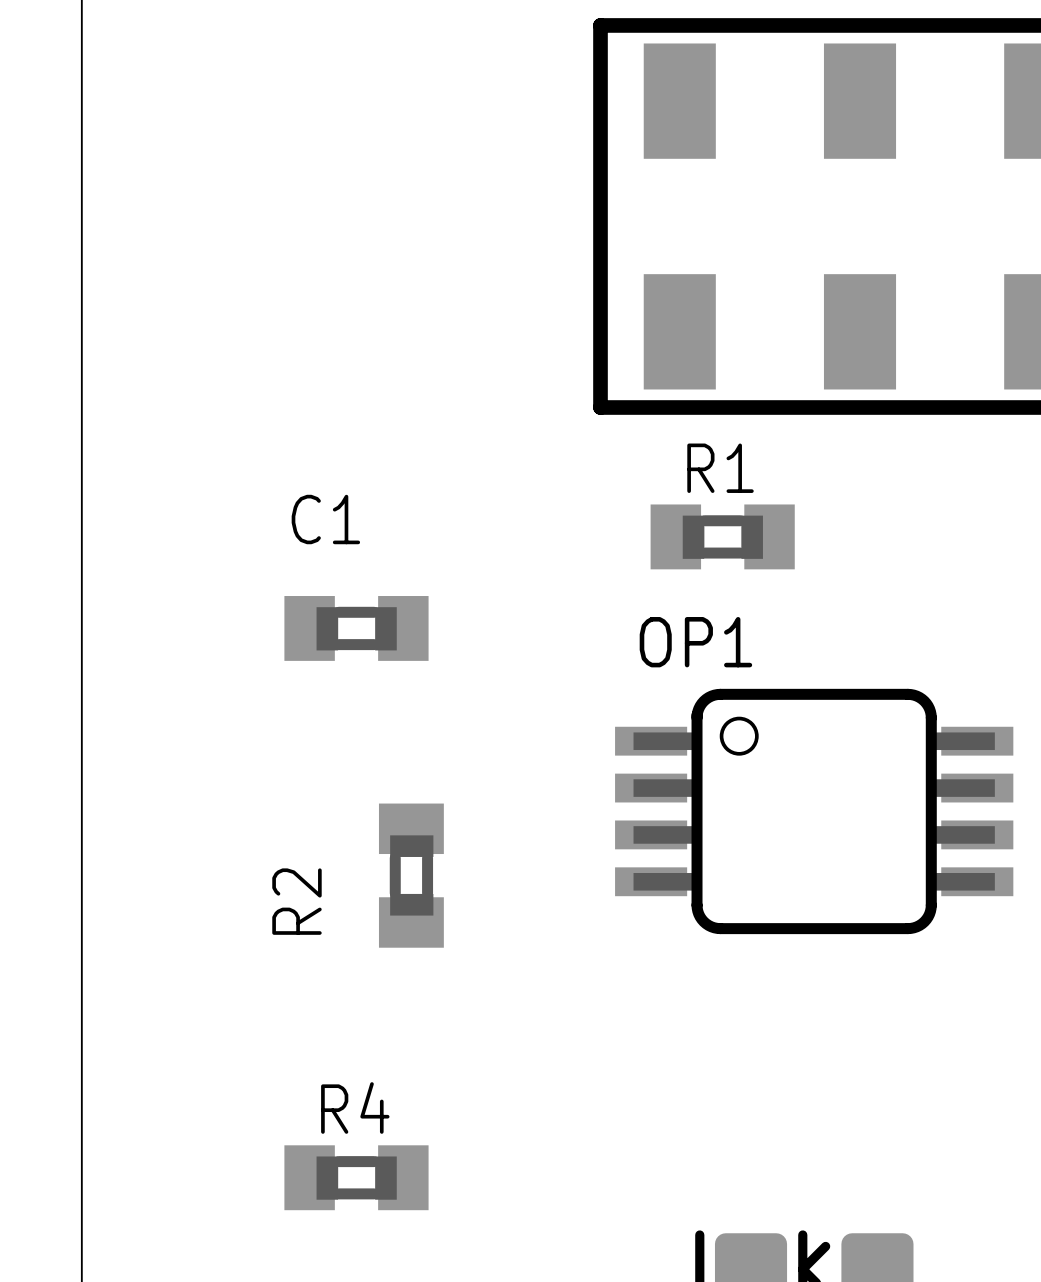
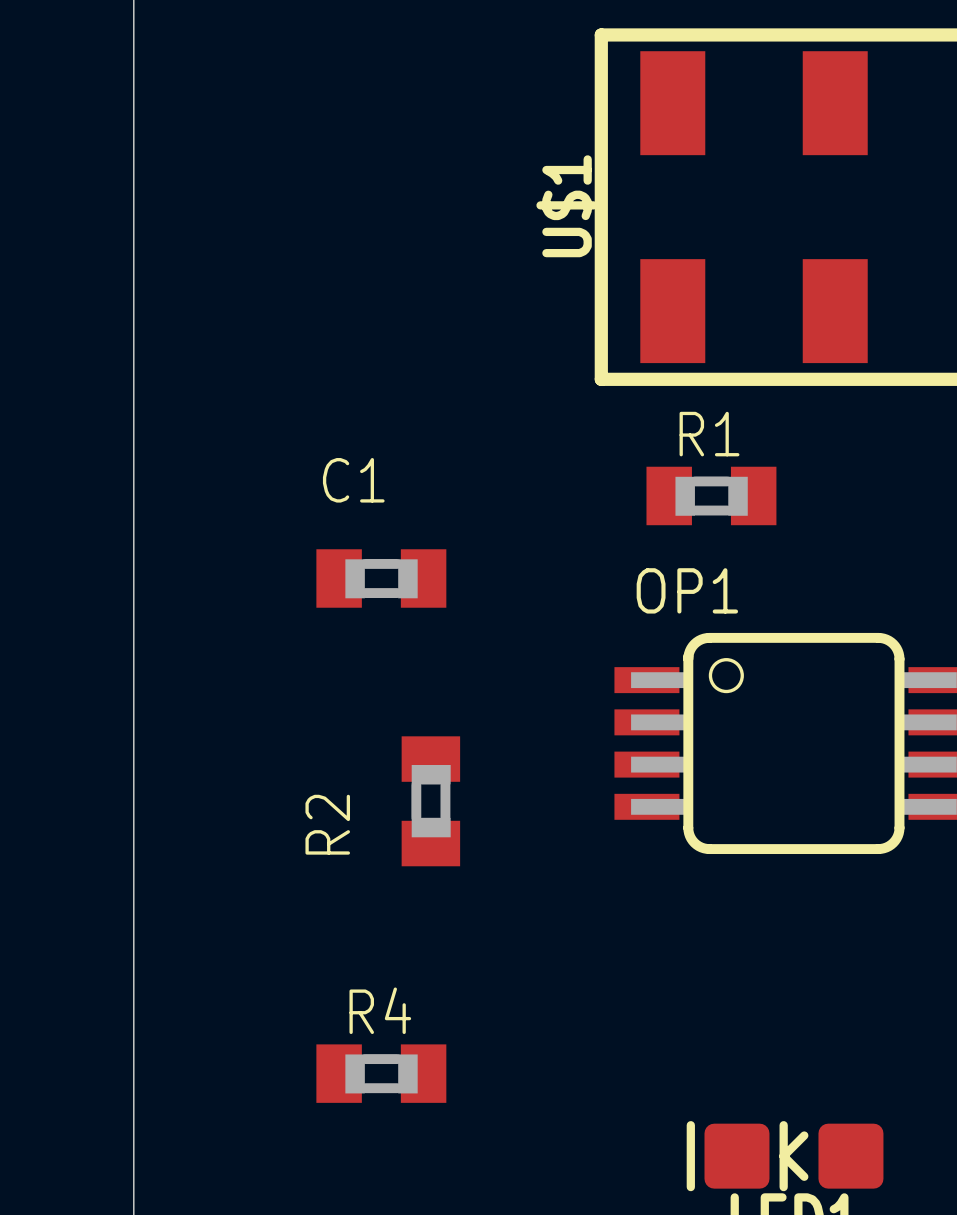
U$1 name: none -> U$1 (567, 206)

